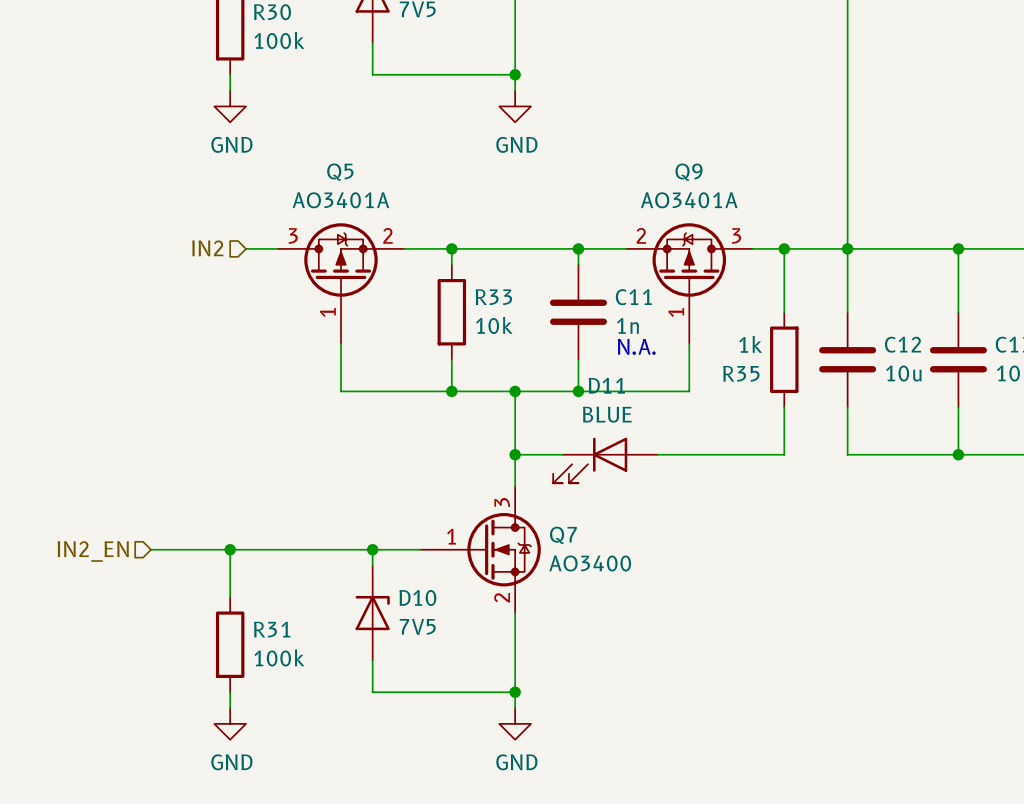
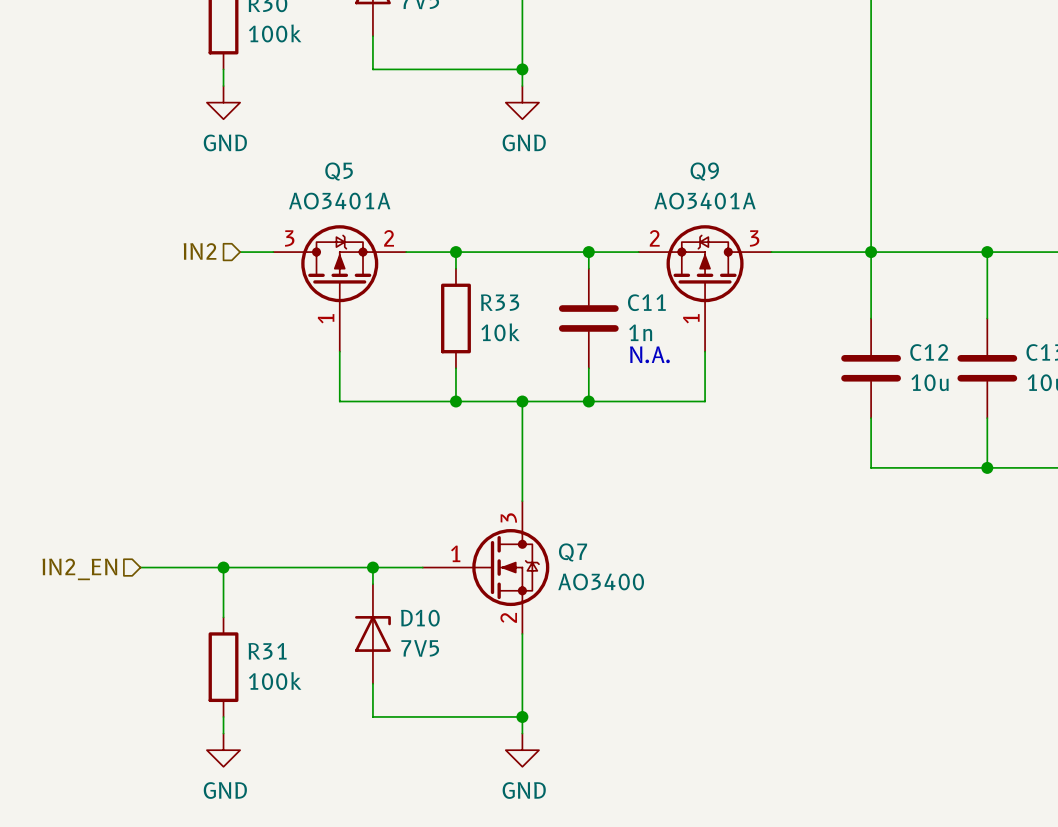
wire: (784, 248) (784, 312) -> none
junction: (784, 248) -> none
R35: 1k (784, 359) -> none
wire: (784, 407) (784, 454) (657, 454) -> none
wire: (515, 454) (562, 454) -> none
junction: (515, 454) -> none
D11: BLUE (605, 460) -> none

